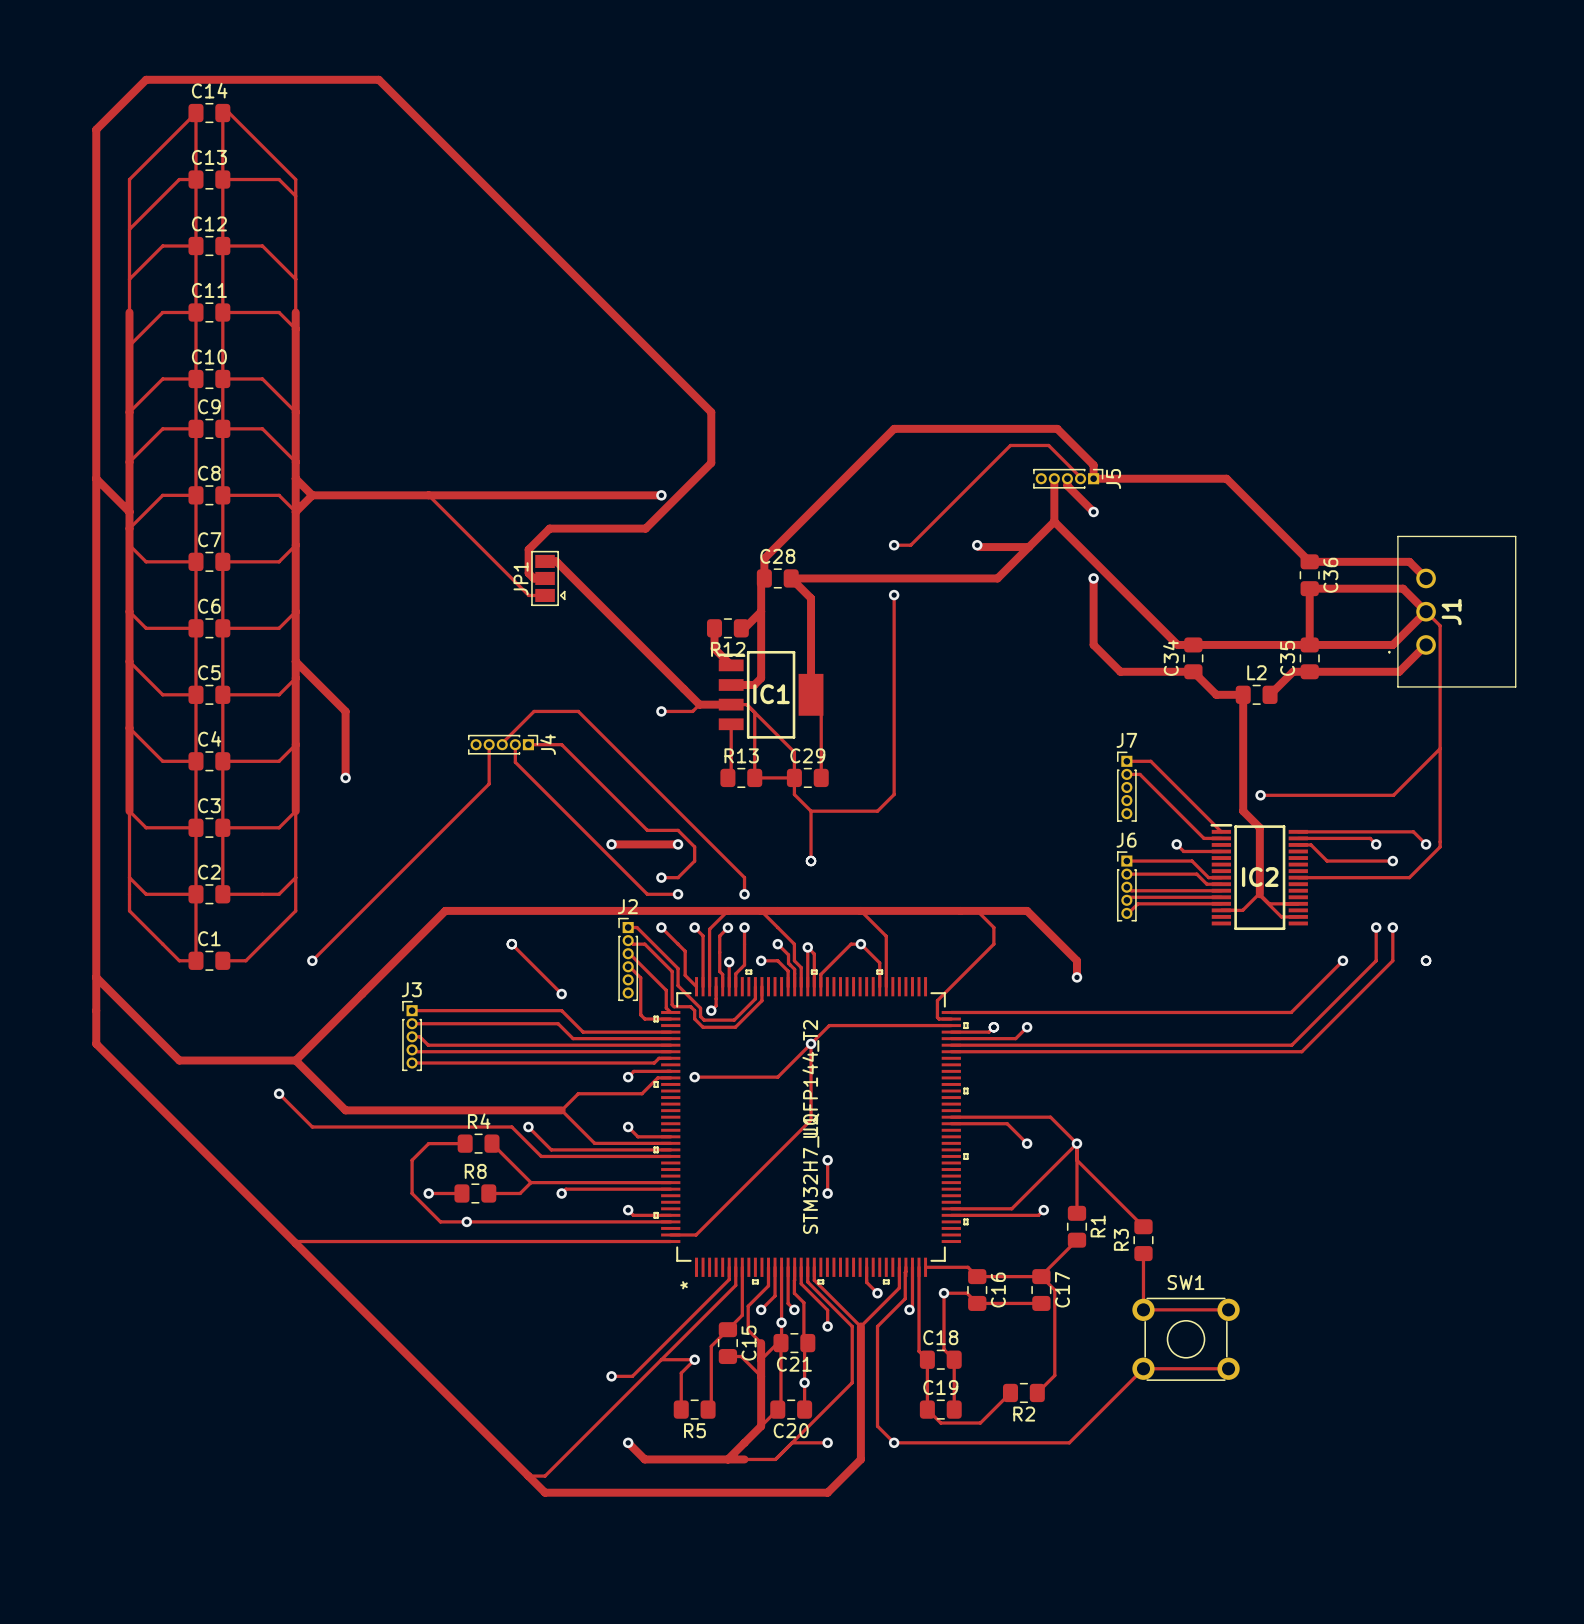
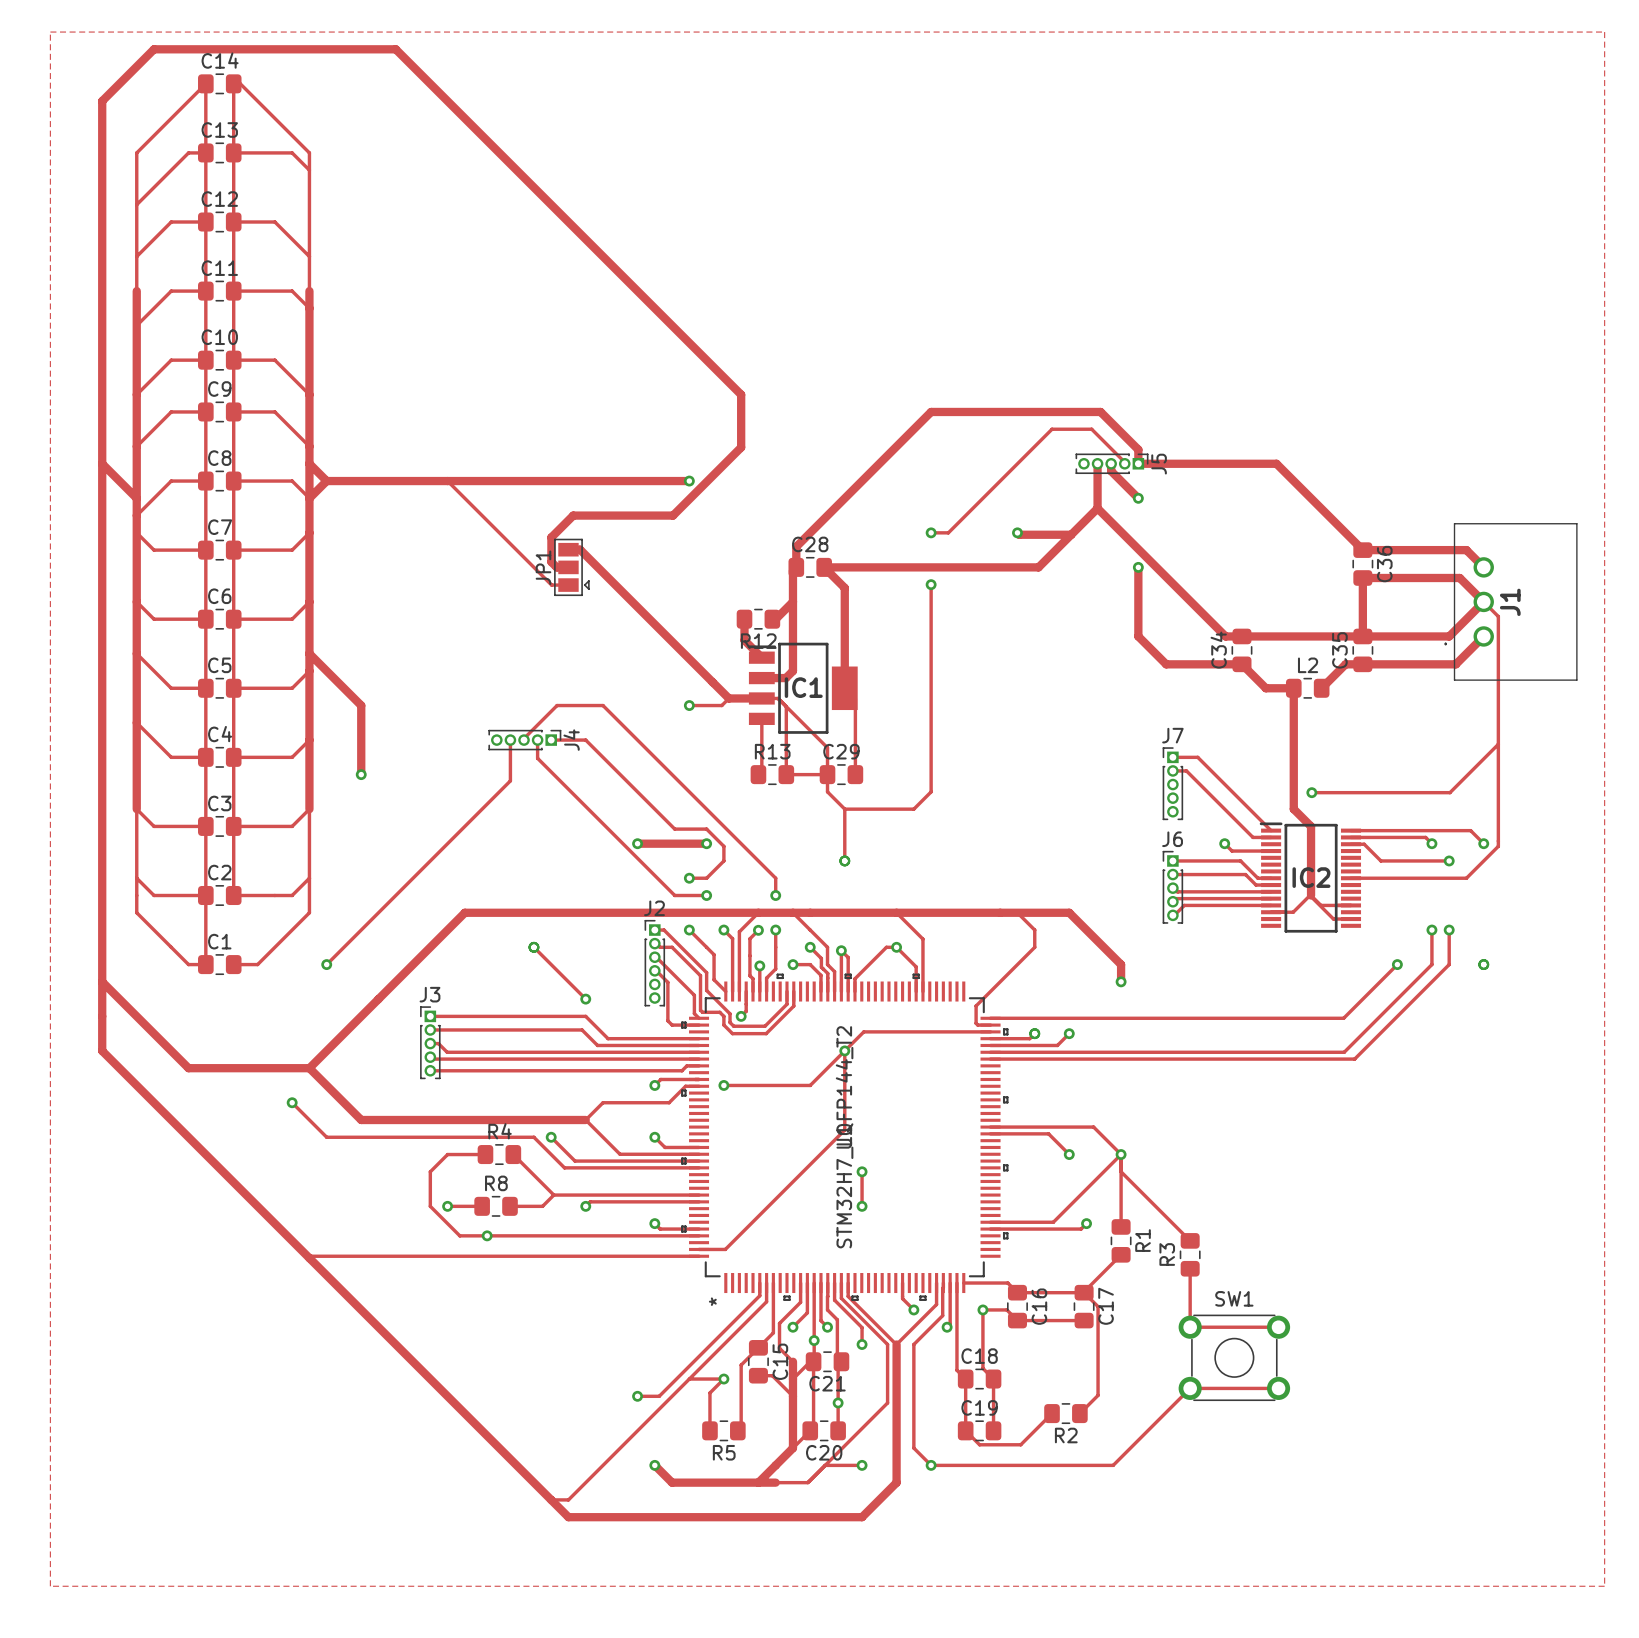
zone outline: none -> (50, 32) (50, 1586) (1604, 1586) (1604, 32) (50, 32)

